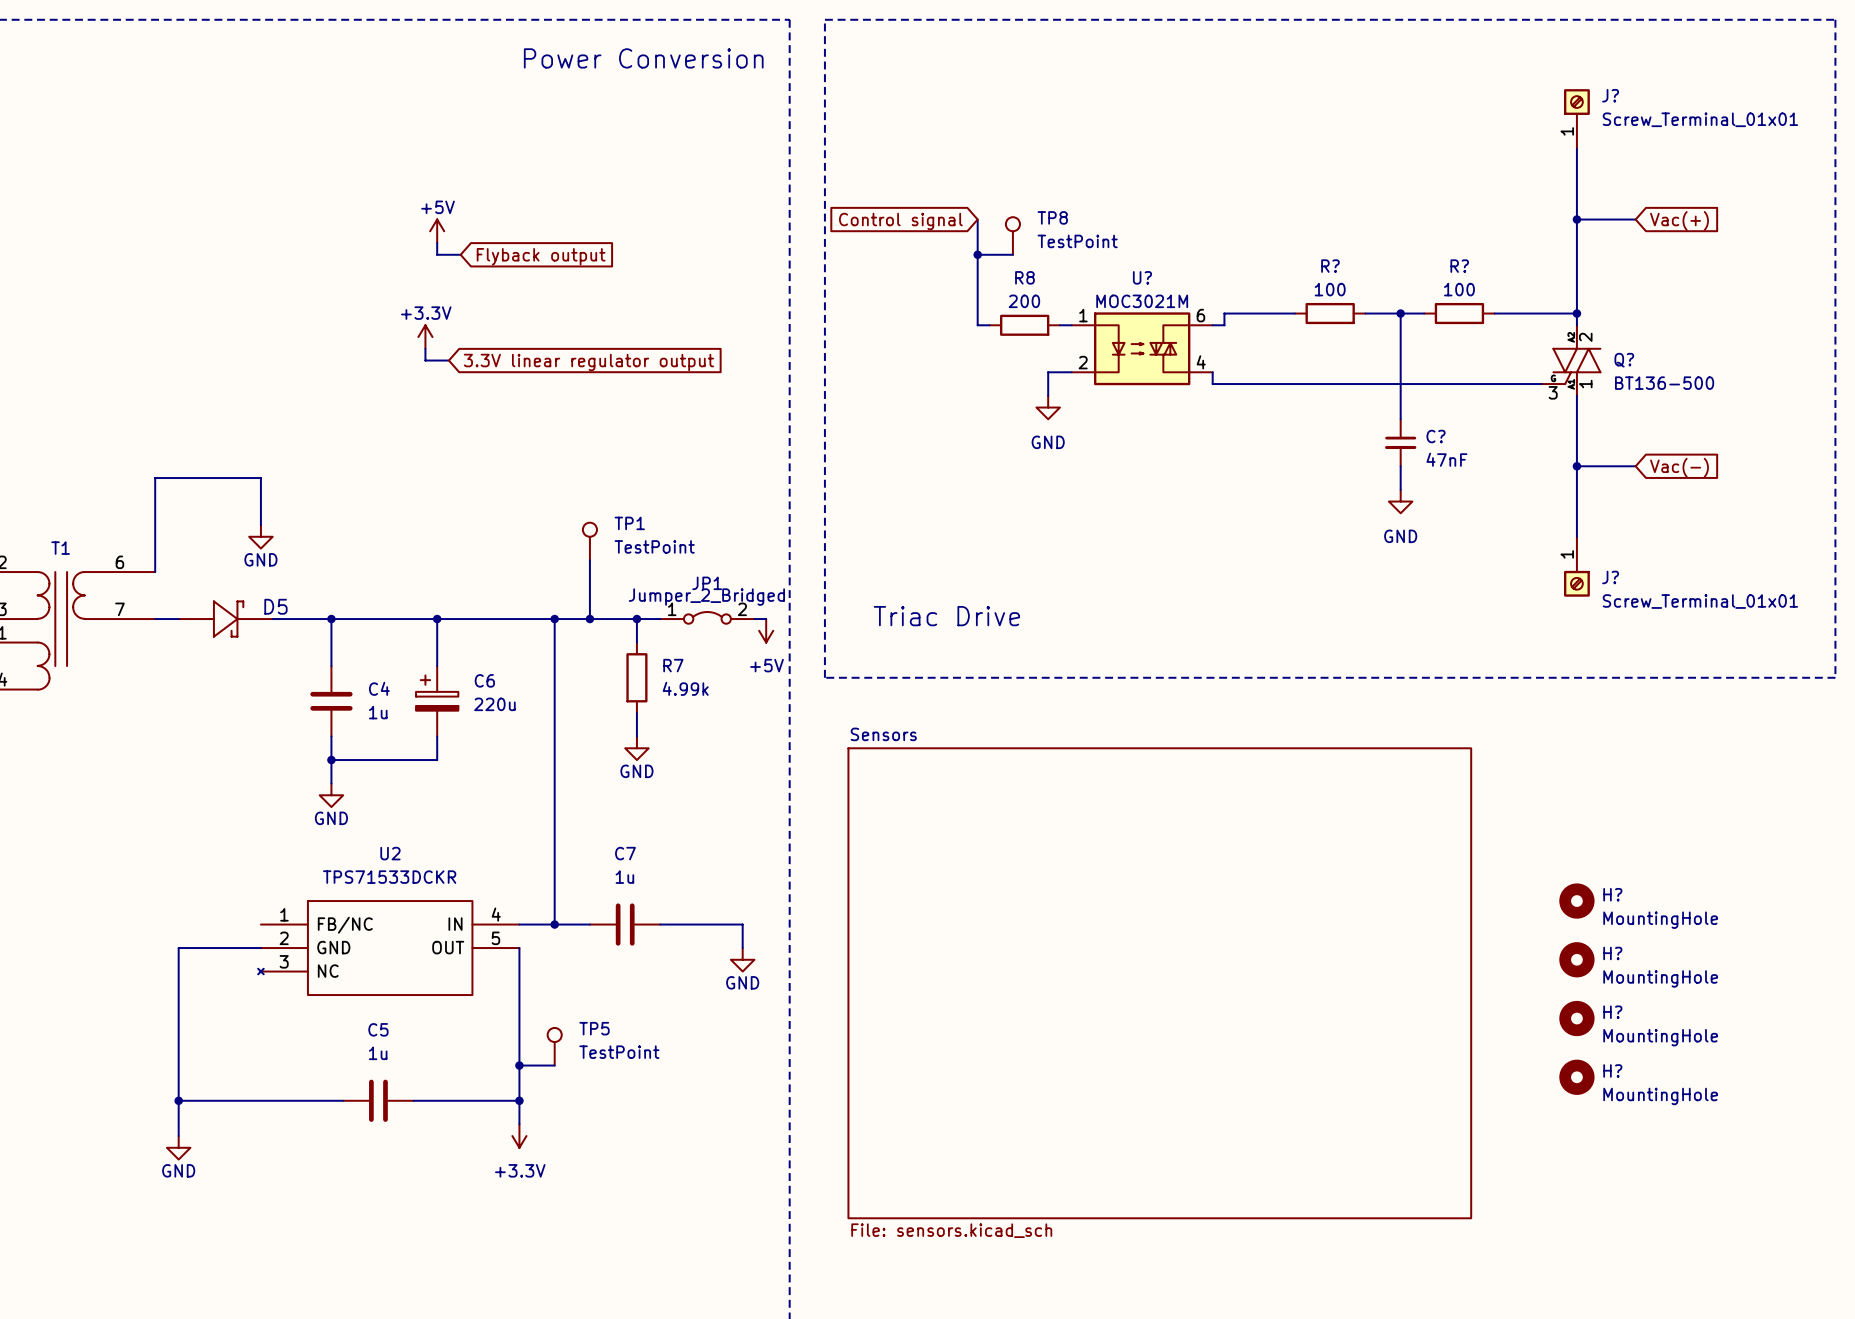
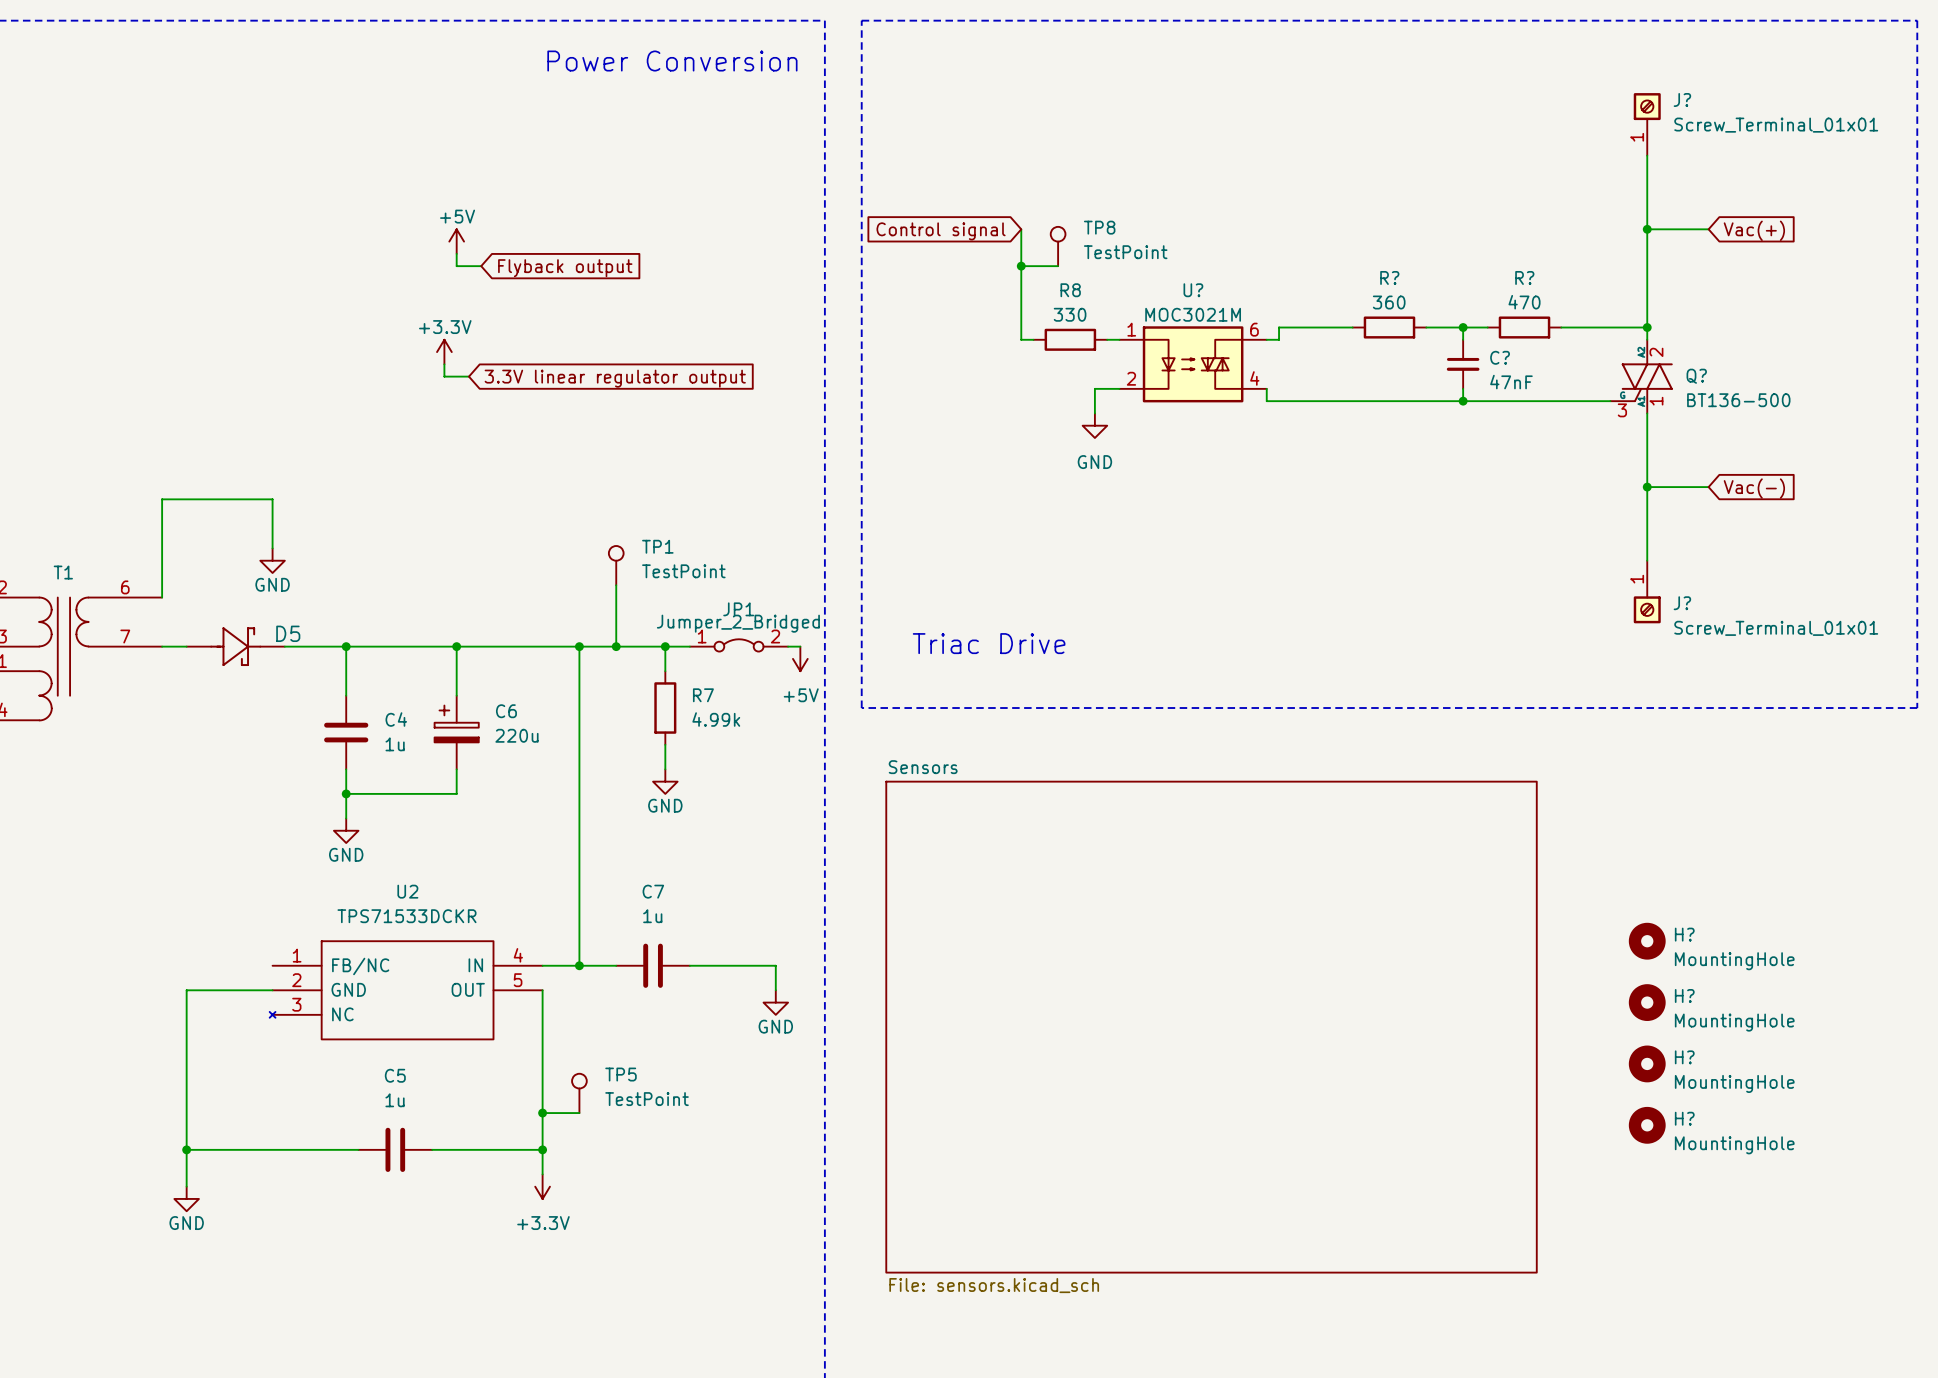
R? value: 100 (1330, 289) -> 360 (1389, 302)
R? value: 100 (1459, 289) -> 470 (1524, 302)
R8 value: 200 (1024, 301) -> 330 (1070, 314)
wire: (1400, 384) (1400, 419) -> none
junction: none -> (1463, 401)
C? position: (1400, 442) -> (1463, 364)
wire: (1400, 466) (1400, 489) -> none
power symbol: GND (1400, 501) -> none

